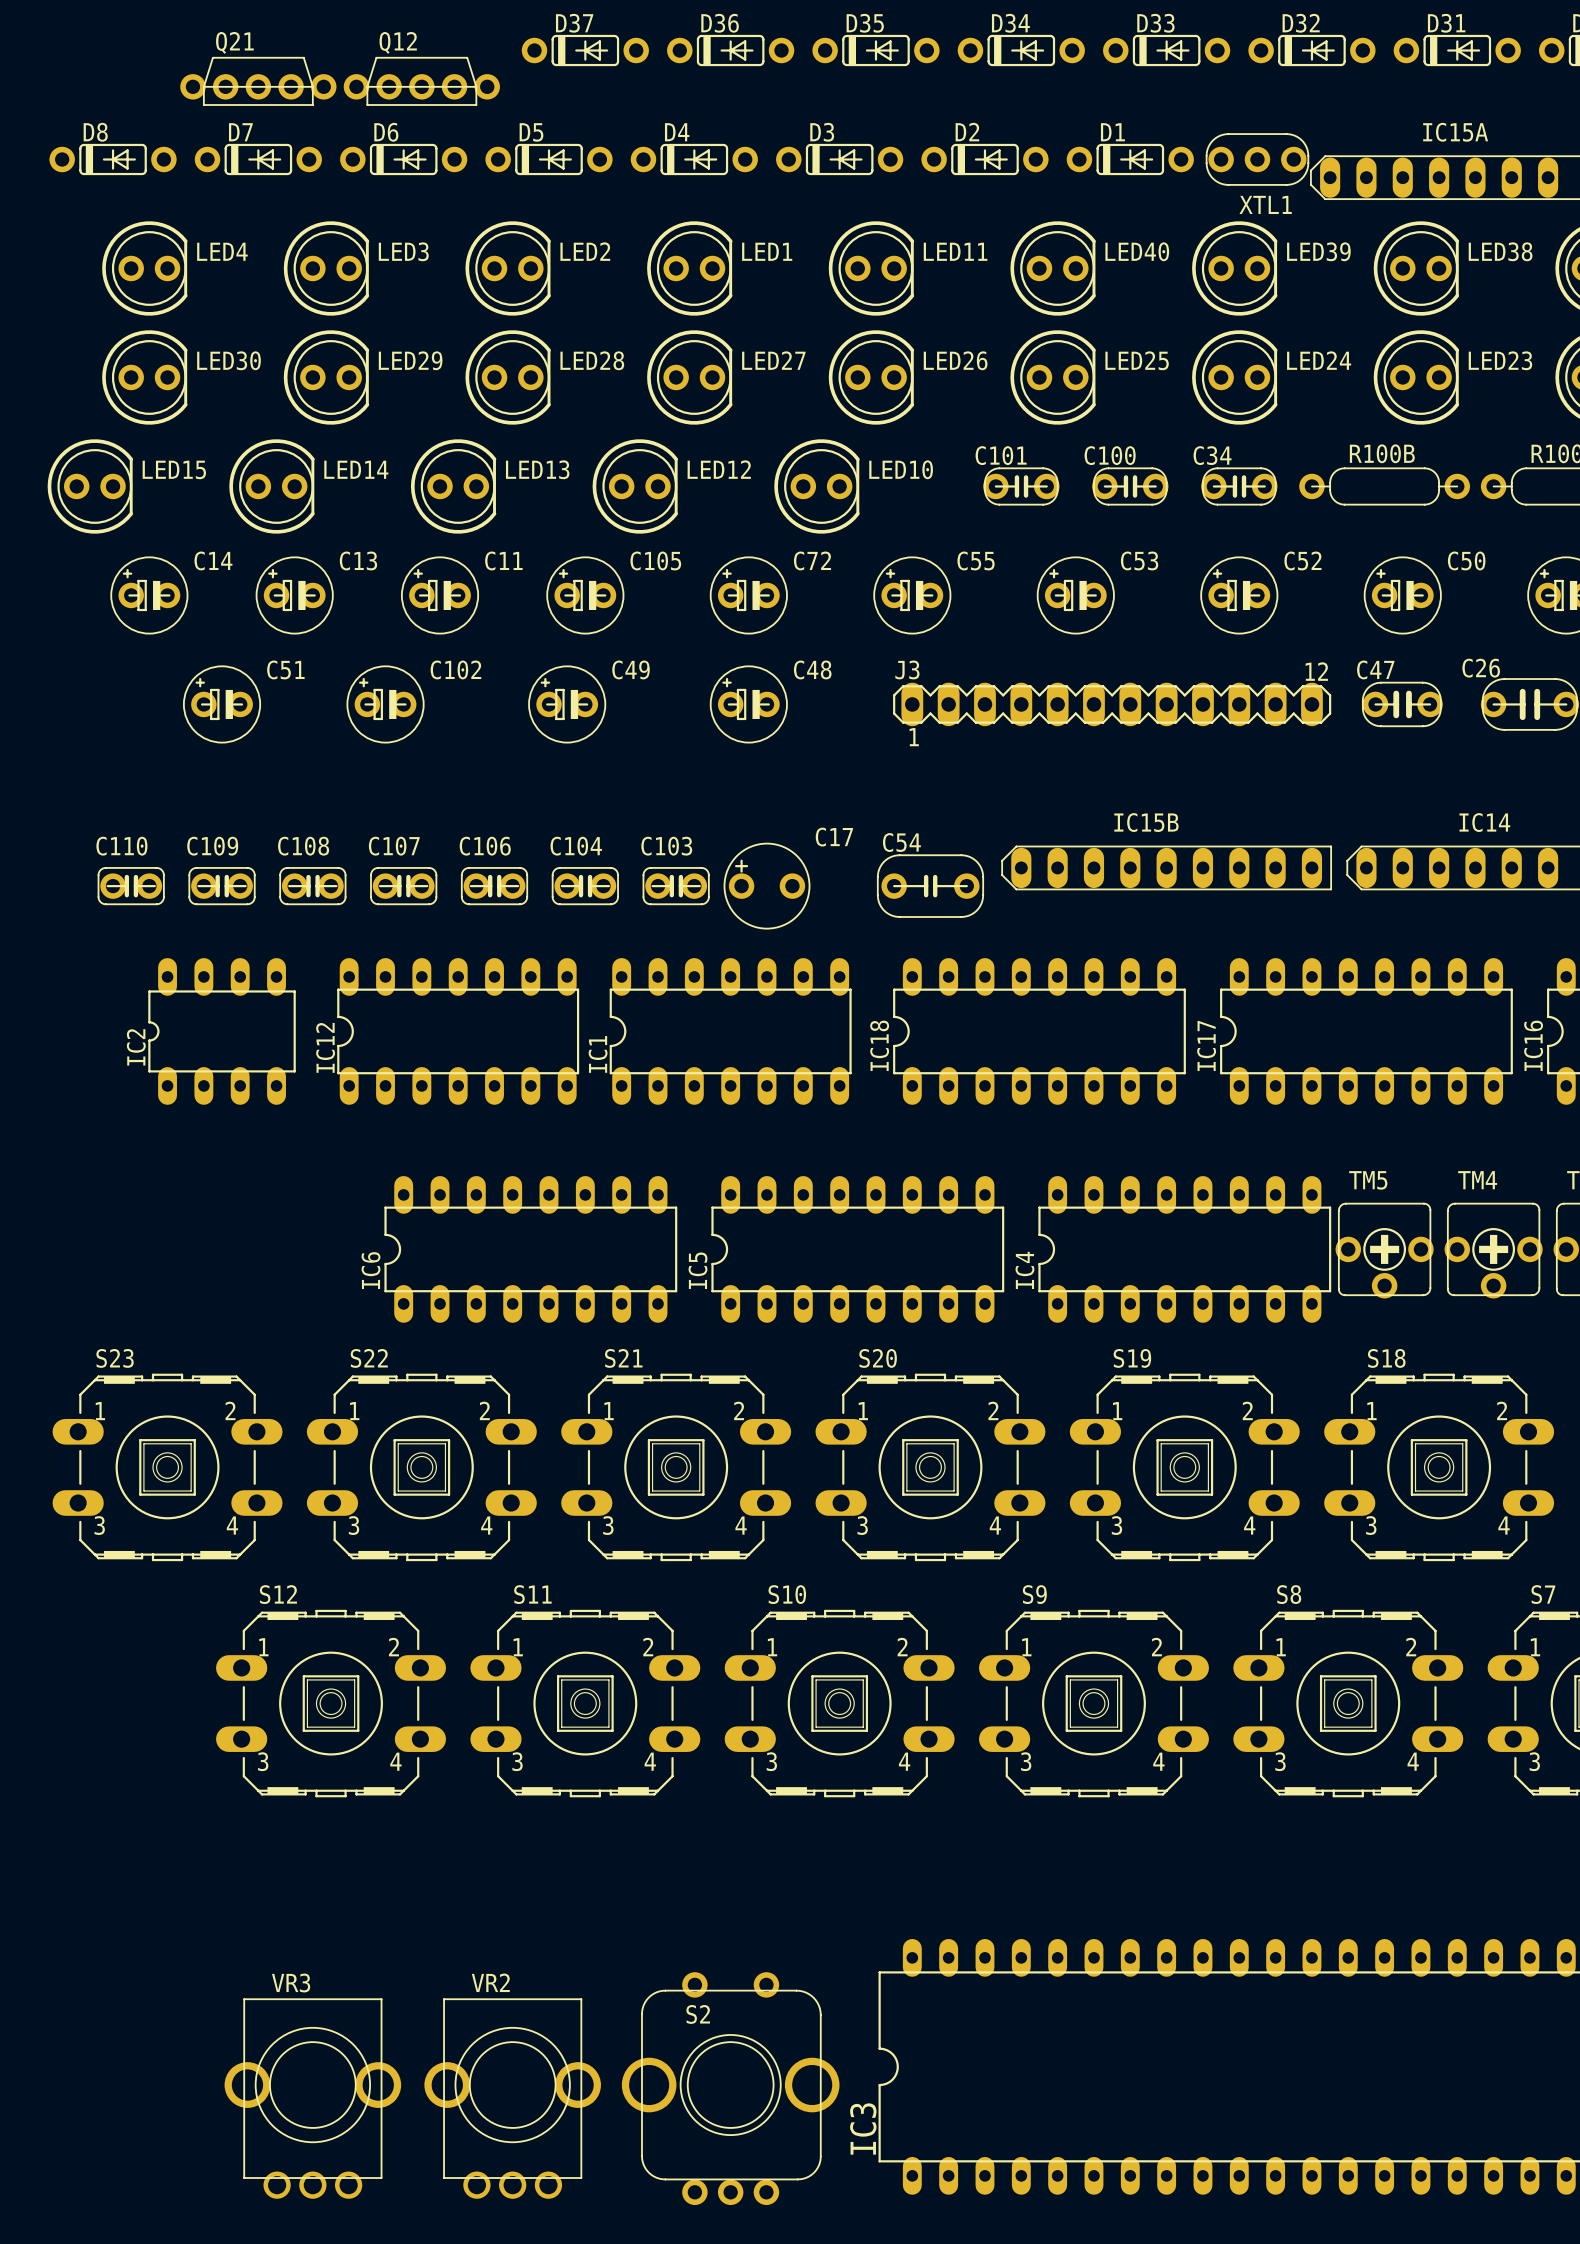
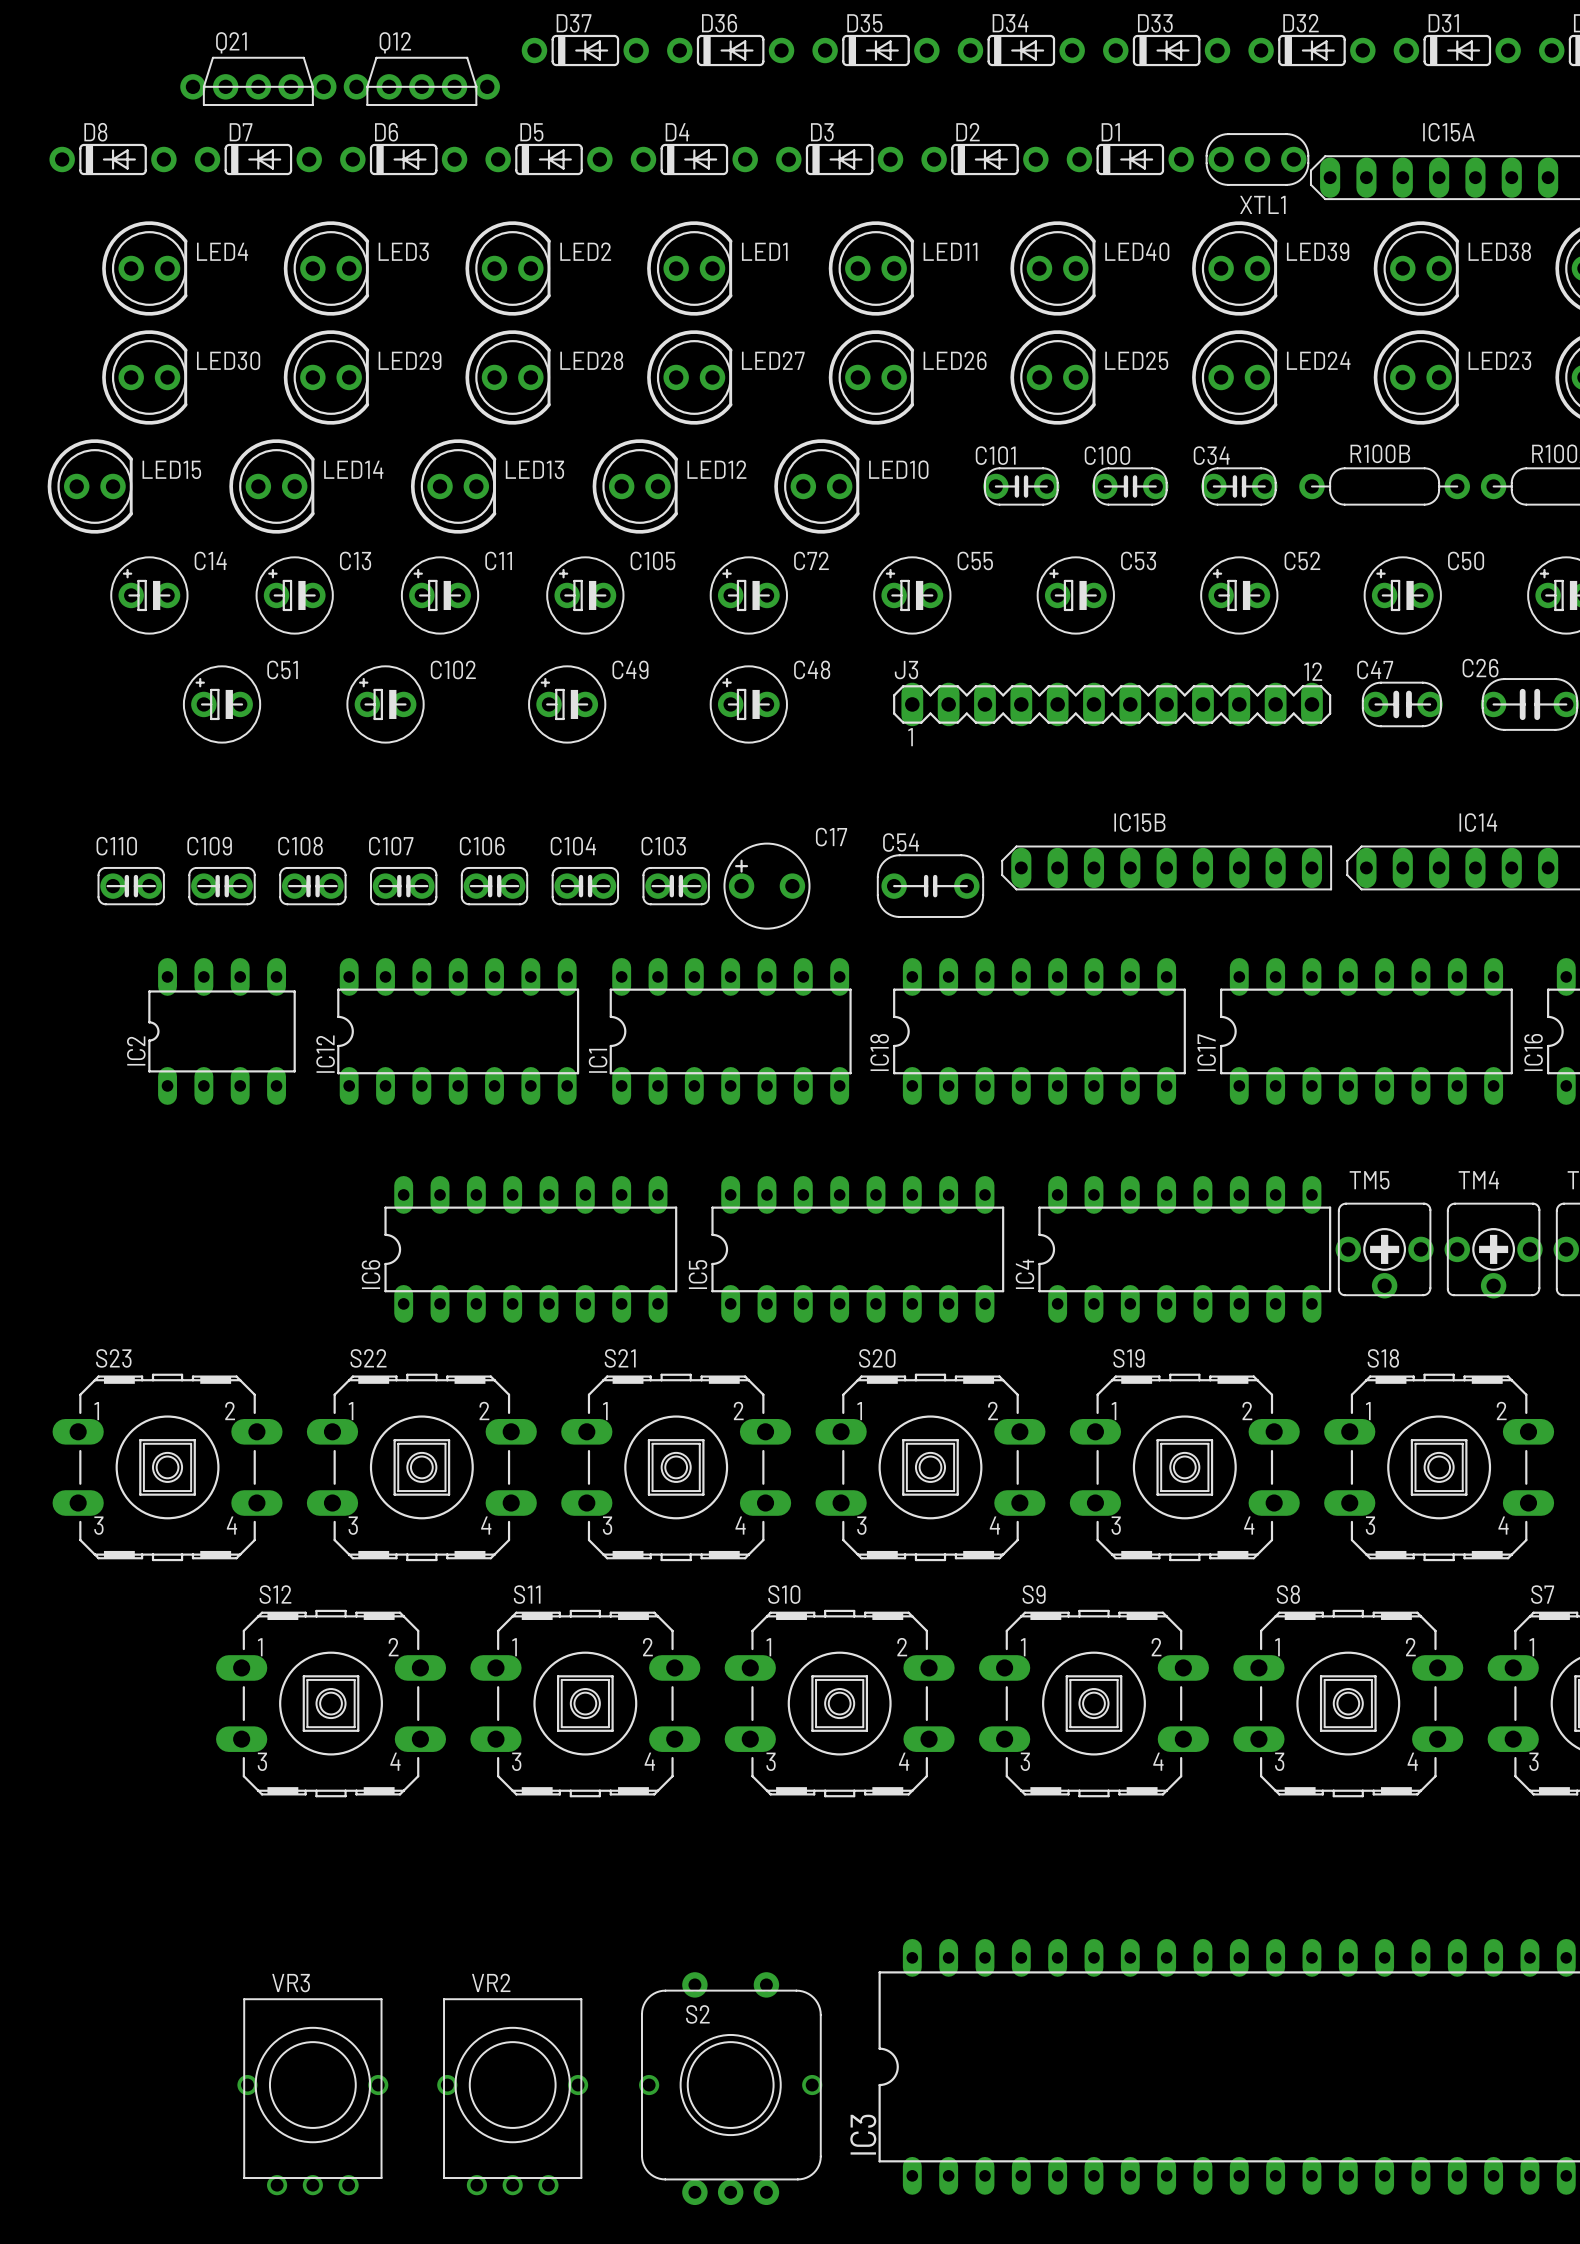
S2 footprint: [621, 1972, 840, 2206] -> [639, 1972, 823, 2206]
VR3 footprint: [224, 1998, 402, 2199] -> [237, 1998, 389, 2196]
VR2 footprint: [424, 1998, 601, 2199] -> [437, 1998, 589, 2196]

